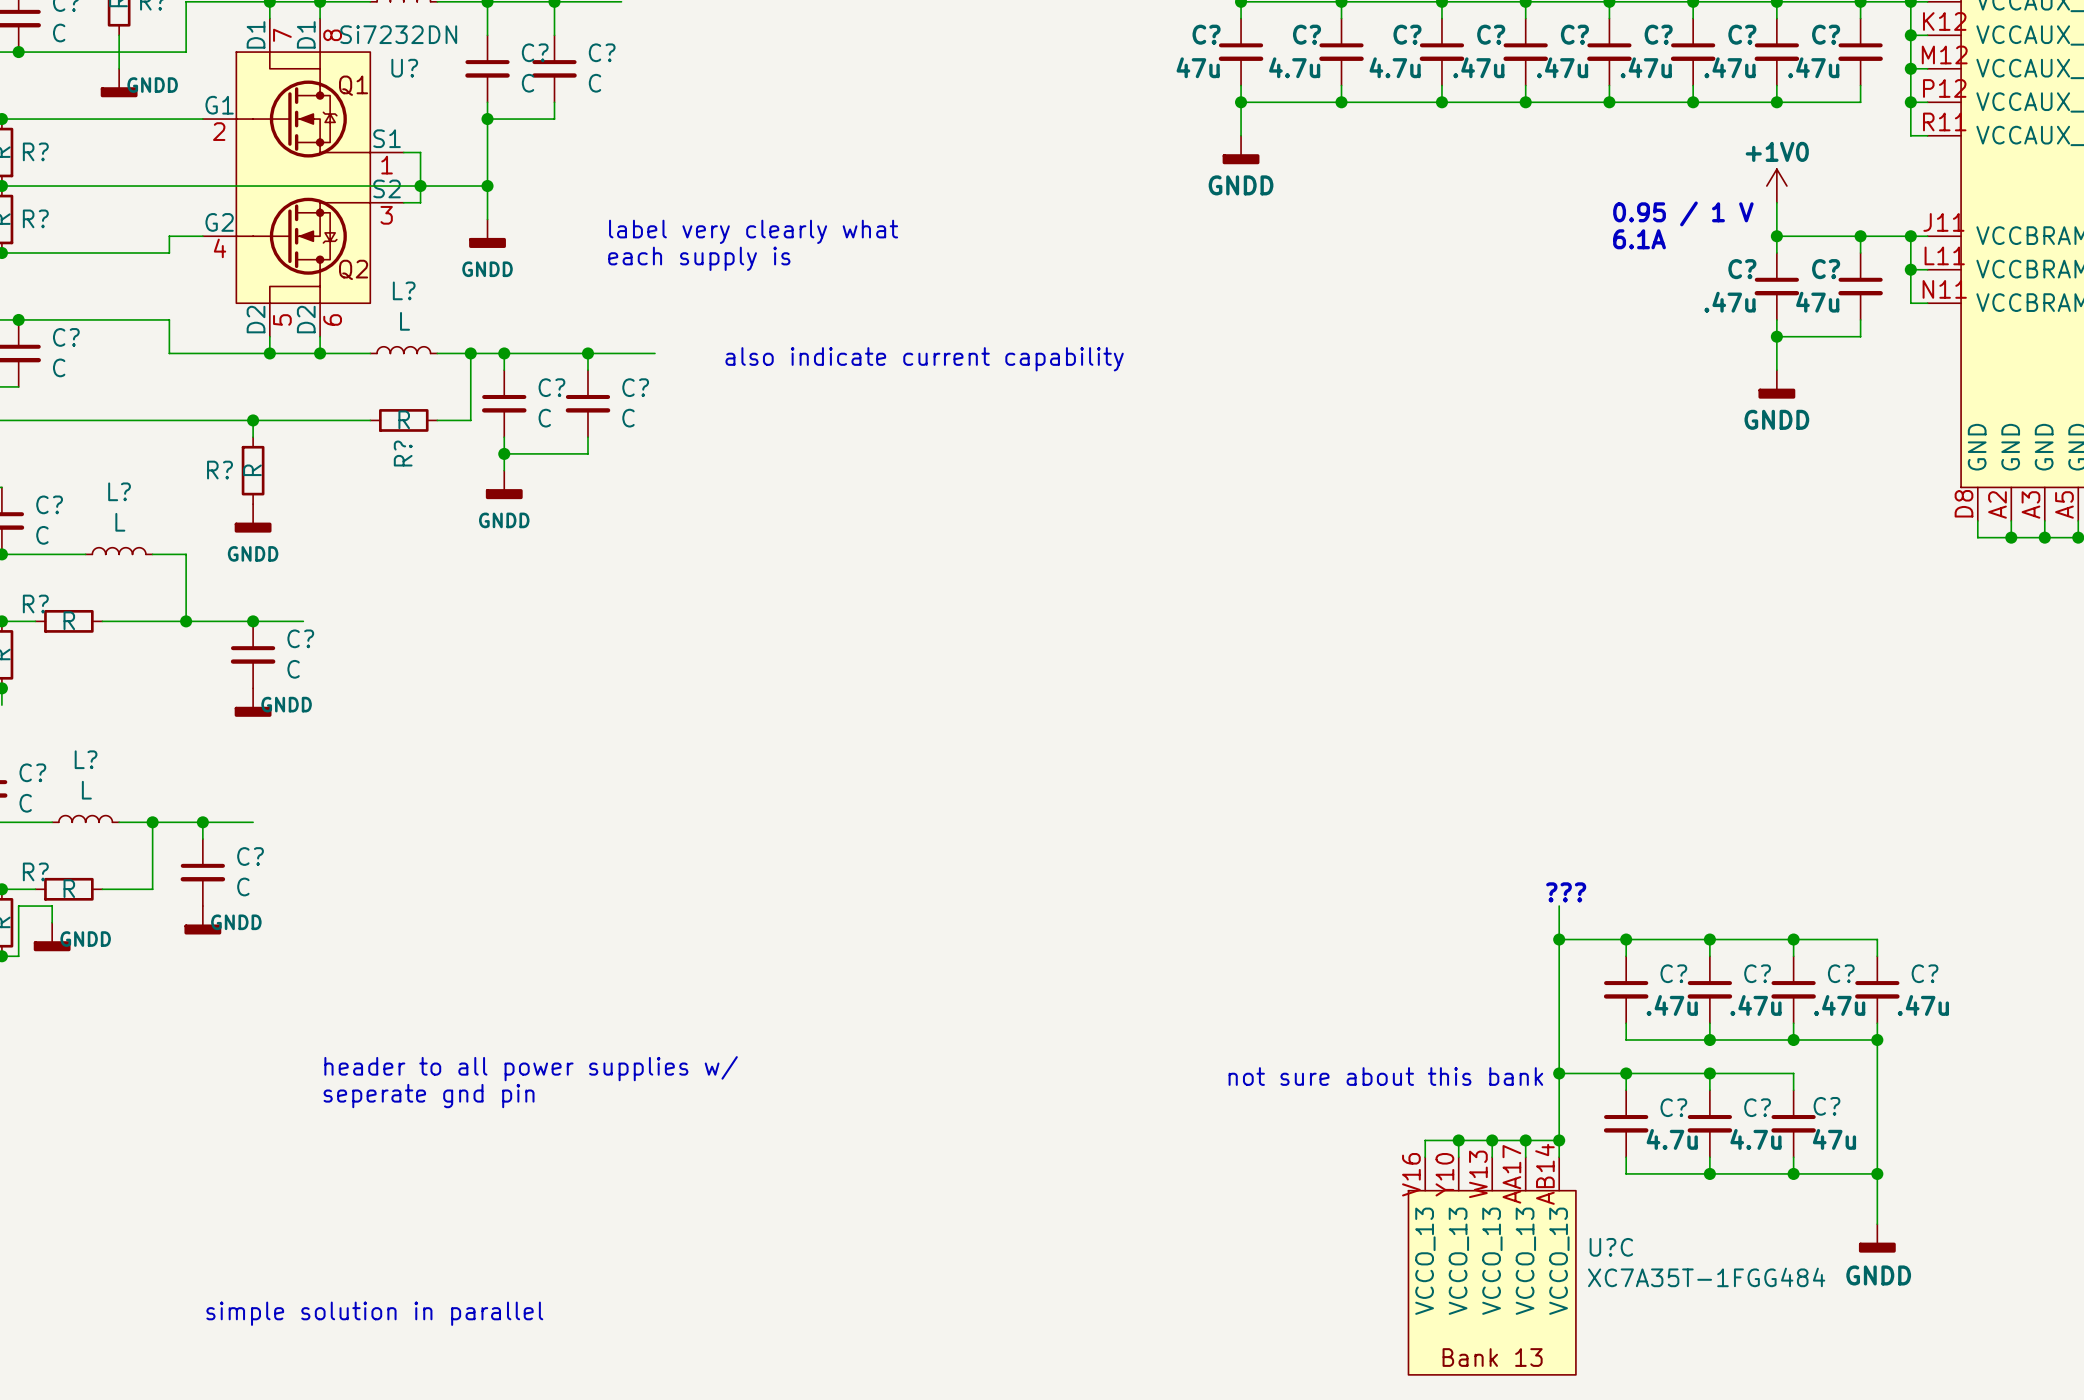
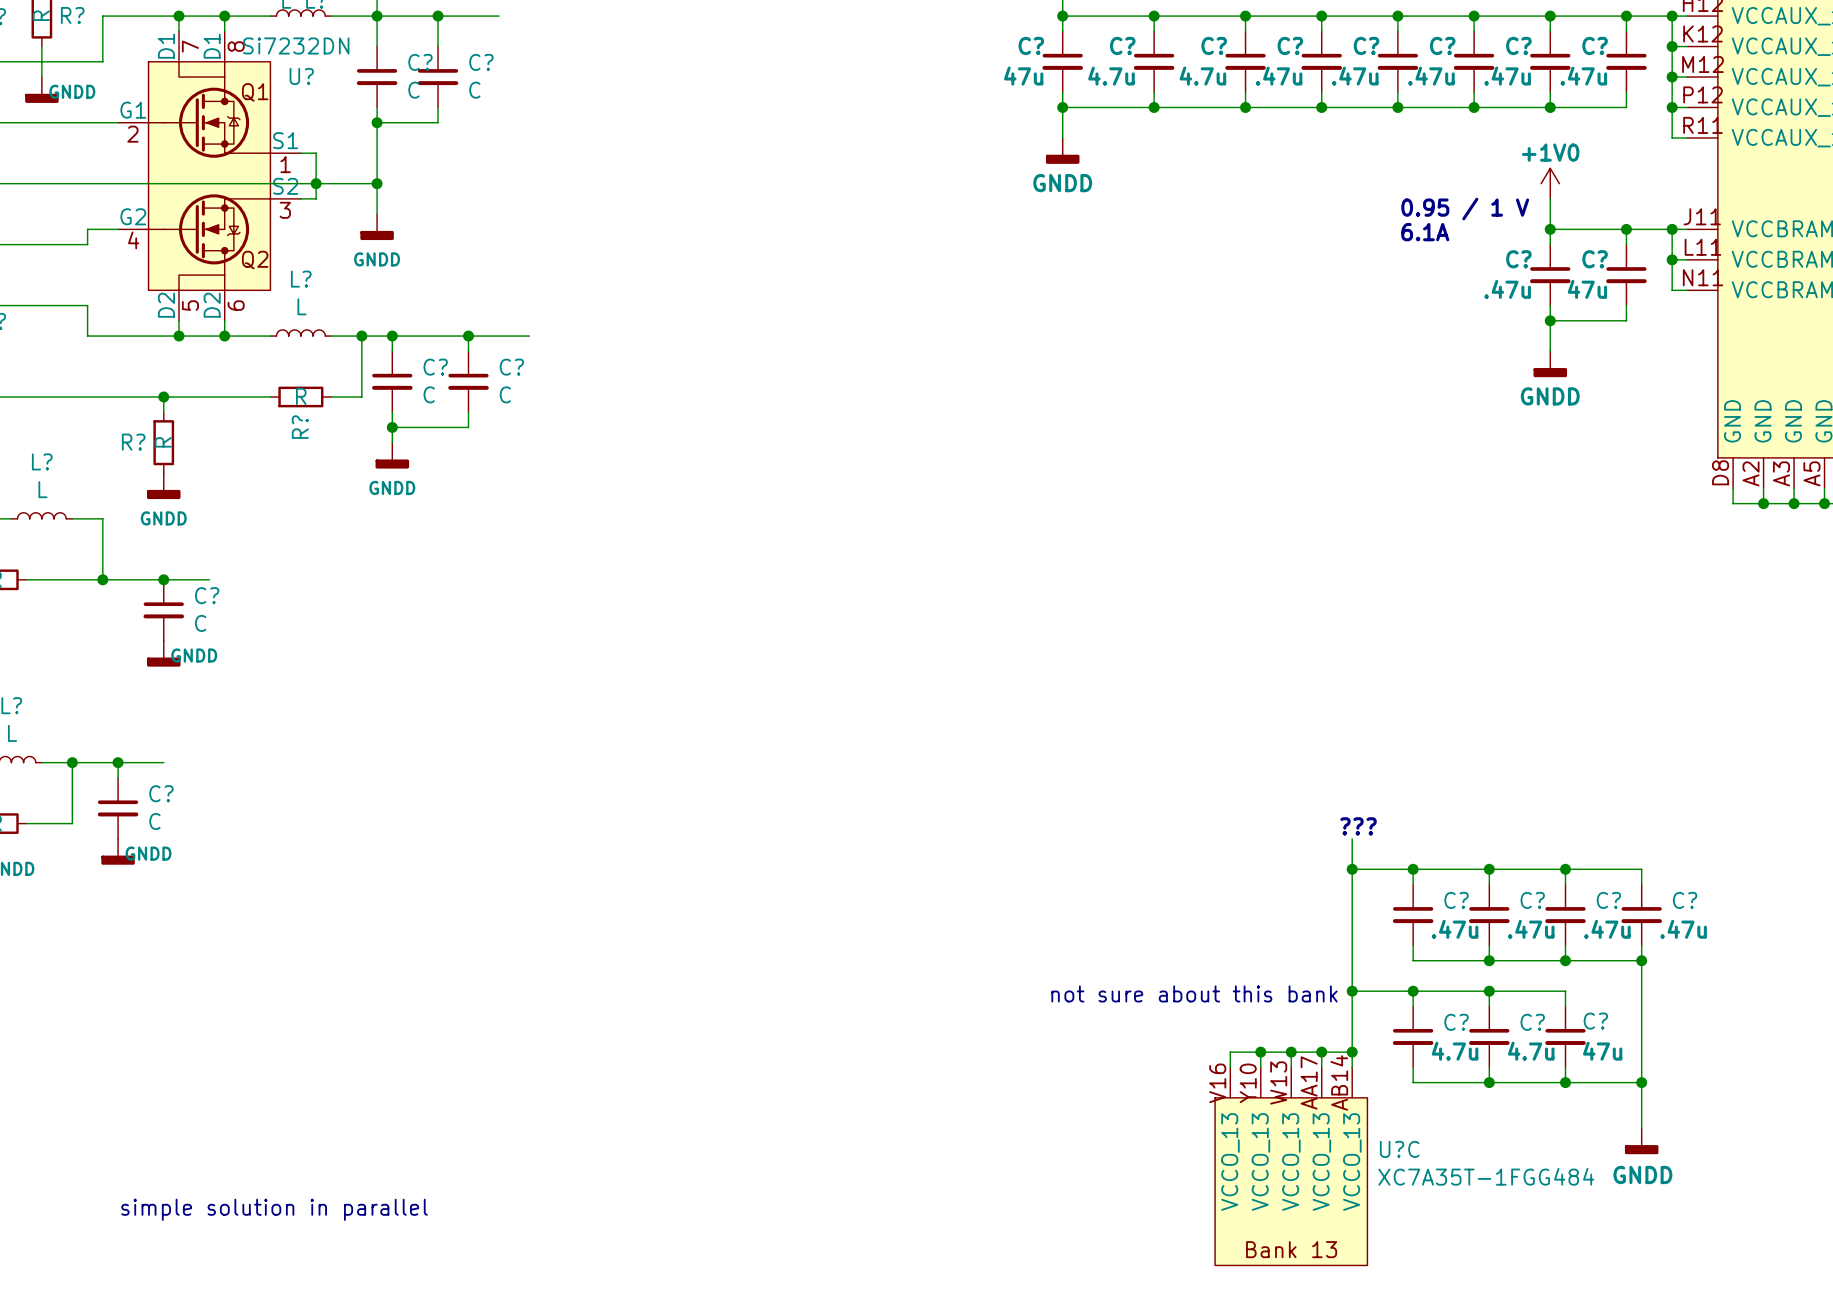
text: label very clearly what (753, 231) -> none
text: each supply is (699, 258) -> none
text: also indicate current capability (924, 359) -> none
text: header to all power supplies w/ (531, 1068) -> none
text: seperate gnd pin (429, 1096) -> none

